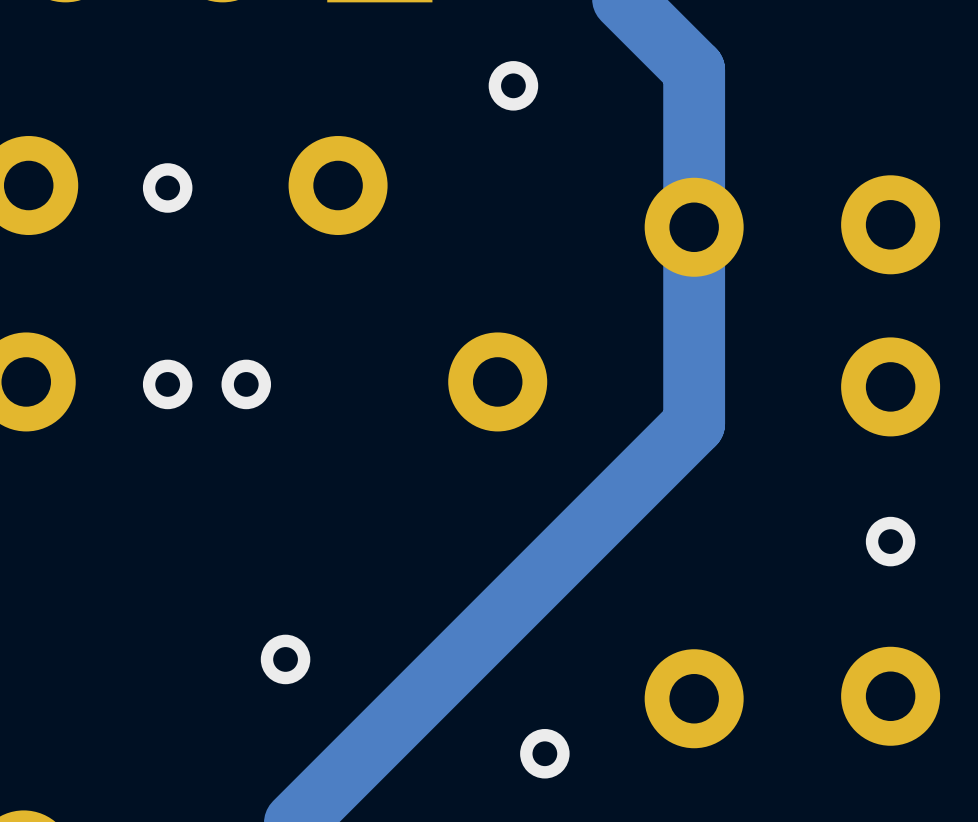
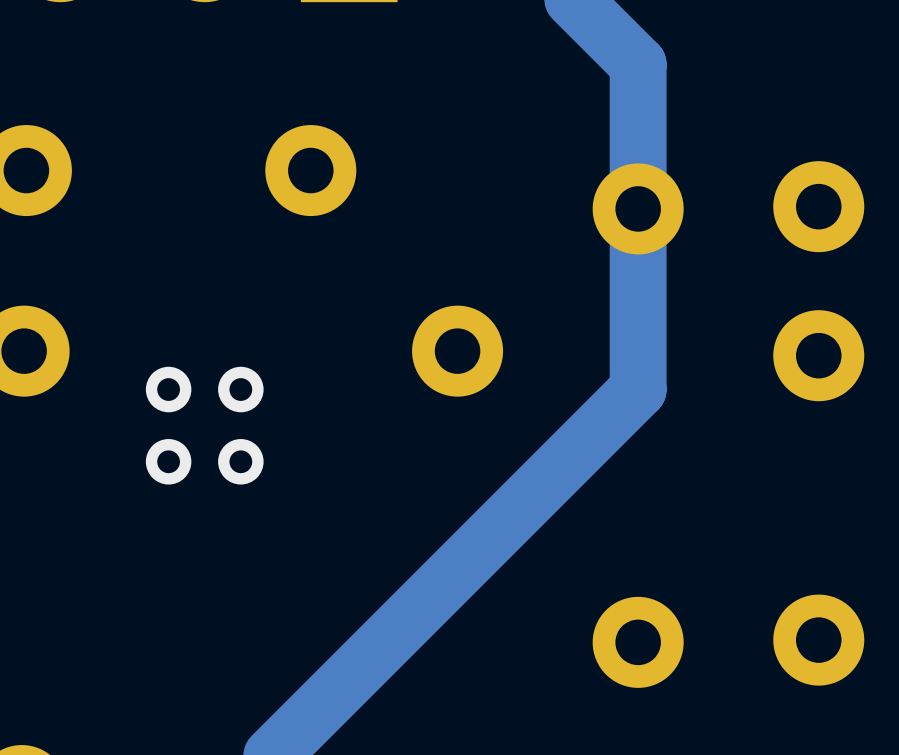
via: (513, 85) -> none
via: (167, 187) -> none
via position: (167, 384) -> (168, 389)
via position: (246, 384) -> (240, 389)
via: none -> (168, 461)
via: none -> (240, 461)
via: (890, 541) -> none
via: (285, 659) -> none
via: (544, 753) -> none

